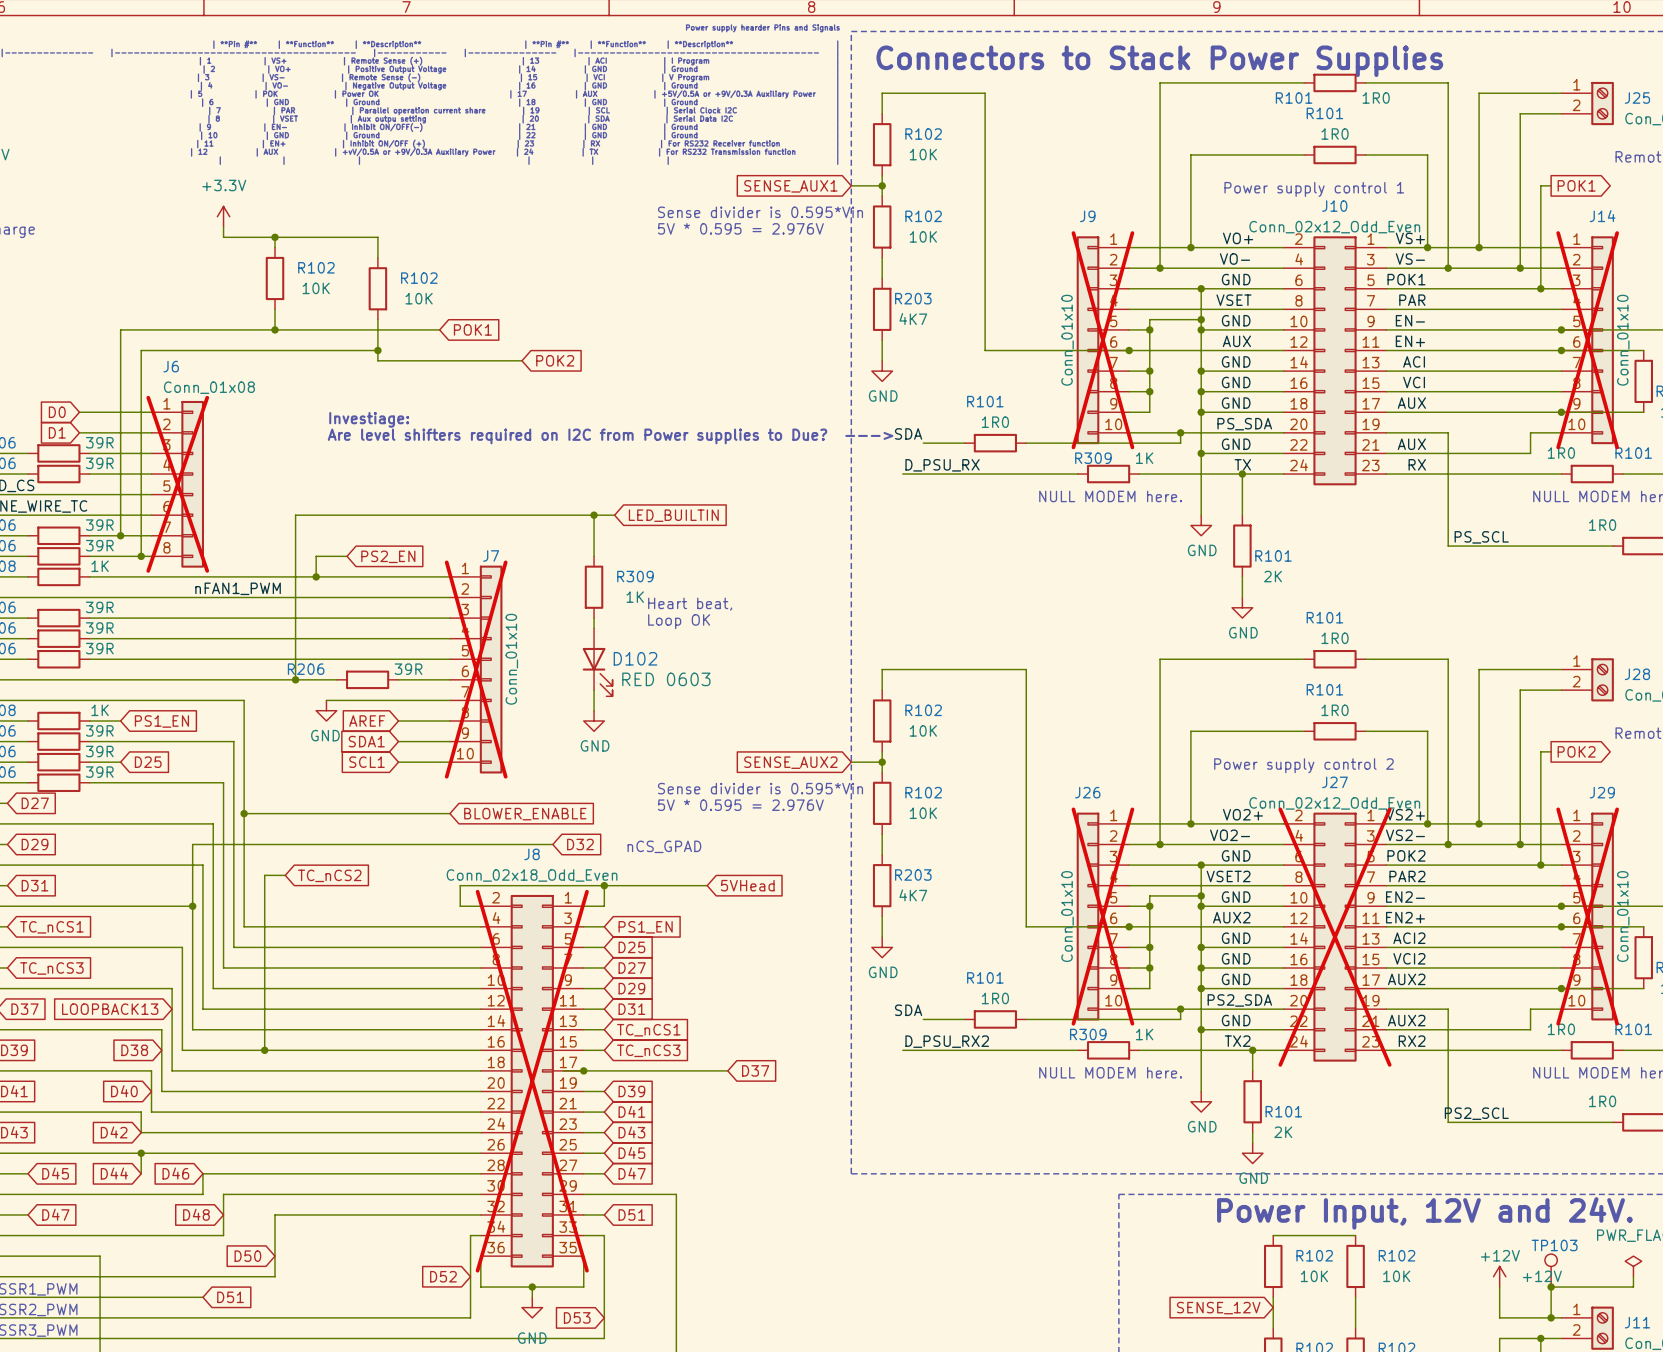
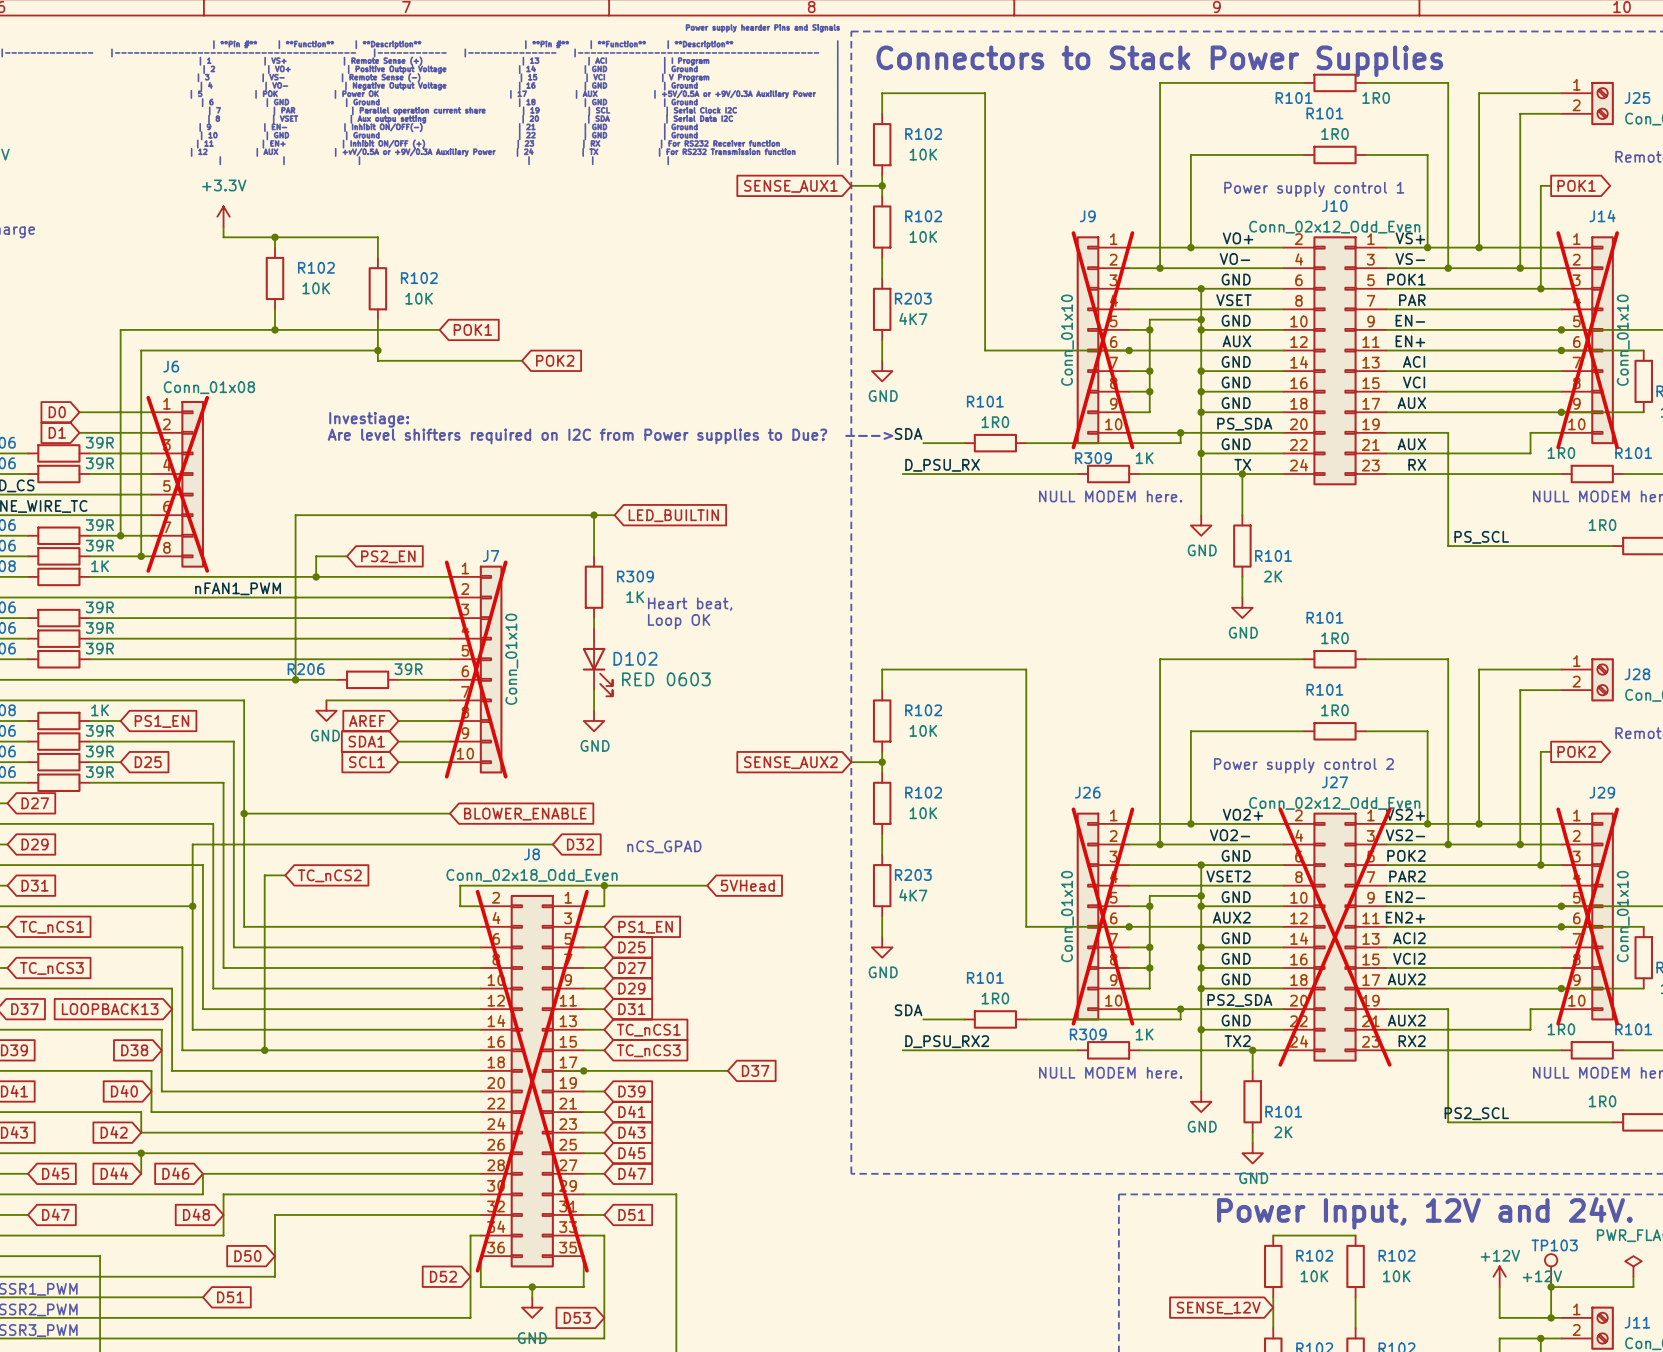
text: Sense divider is 0.595*Vin (760, 212) -> none
text: 5V * 0.595 = 2.976V (740, 228) -> none
text: Sense divider is 0.595*Vin (760, 788) -> none
text: 5V * 0.595 = 2.976V (740, 805) -> none

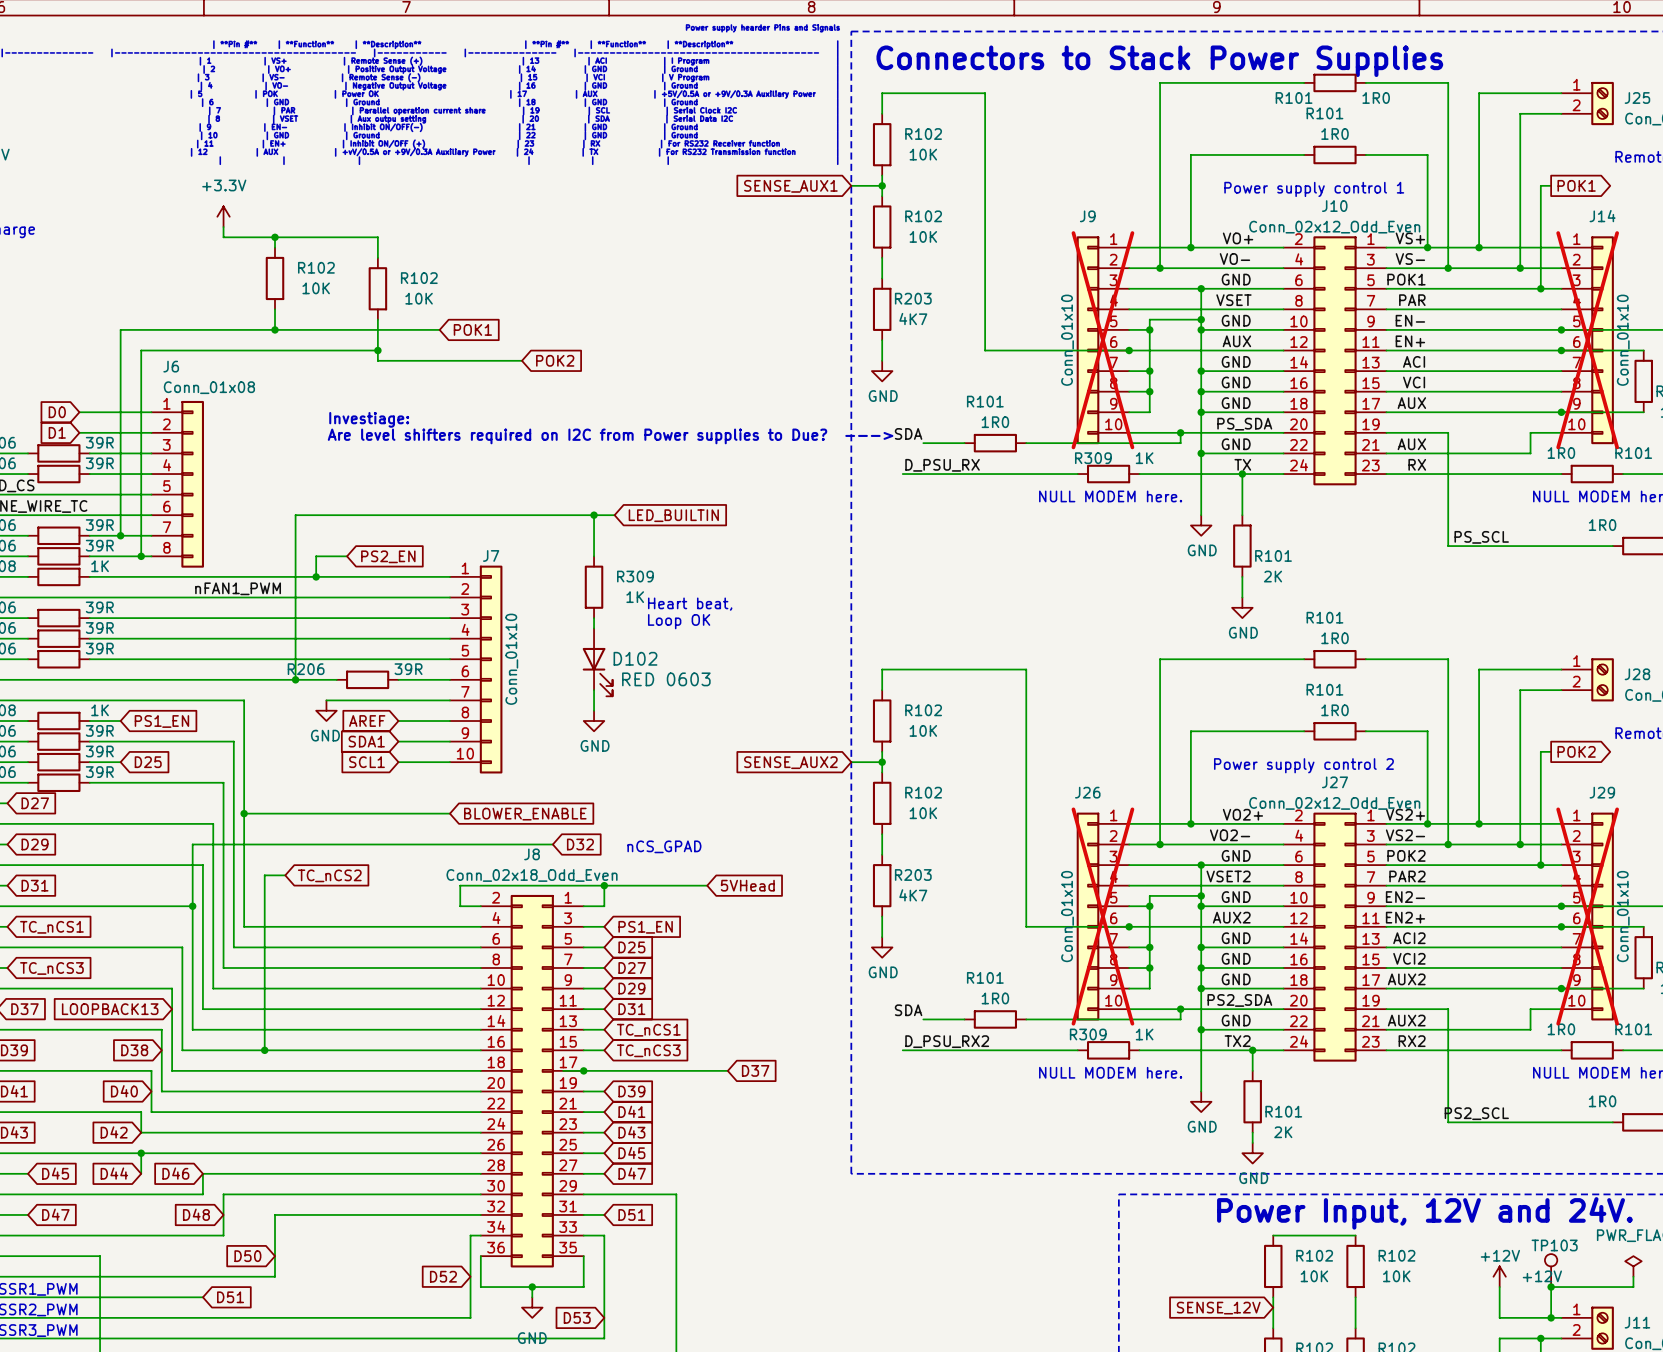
J6 do-not-place cross: (177, 484) -> none
J7 do-not-place cross: (476, 669) -> none
J27 do-not-place cross: (1335, 937) -> none
J8 do-not-place cross: (532, 1081) -> none

